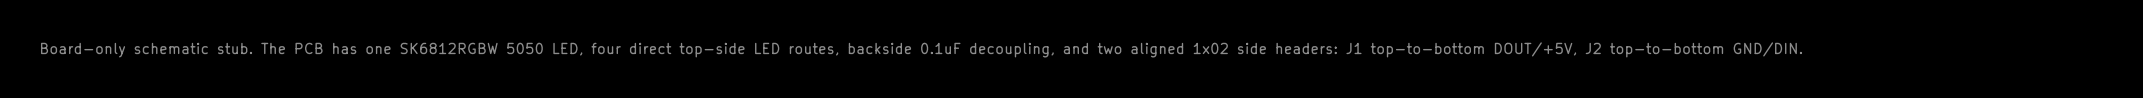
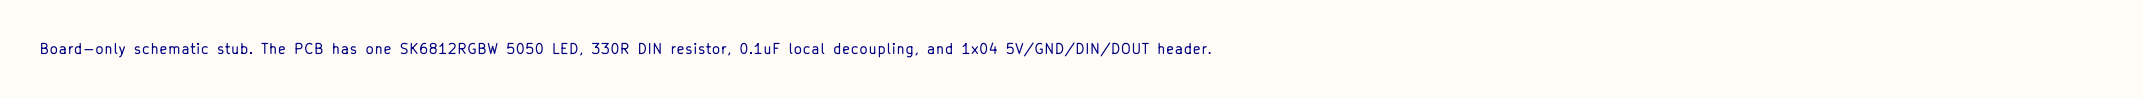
text: Board-only schematic stub. The PCB has one SK6812RGBW 5050 LED, four direct top-side LED routes, backside 0.1uF decoupling, and two aligned 1x02 side headers: J1 top-to-bottom DOUT/+5V, J2 top-to-bottom GND/DIN. (921, 49) -> Board-only schematic stub. The PCB has one SK6812RGBW 5050 LED, 330R DIN resistor, 0.1uF local decoupling, and 1x04 5V/GND/DIN/DOUT header. (625, 49)

